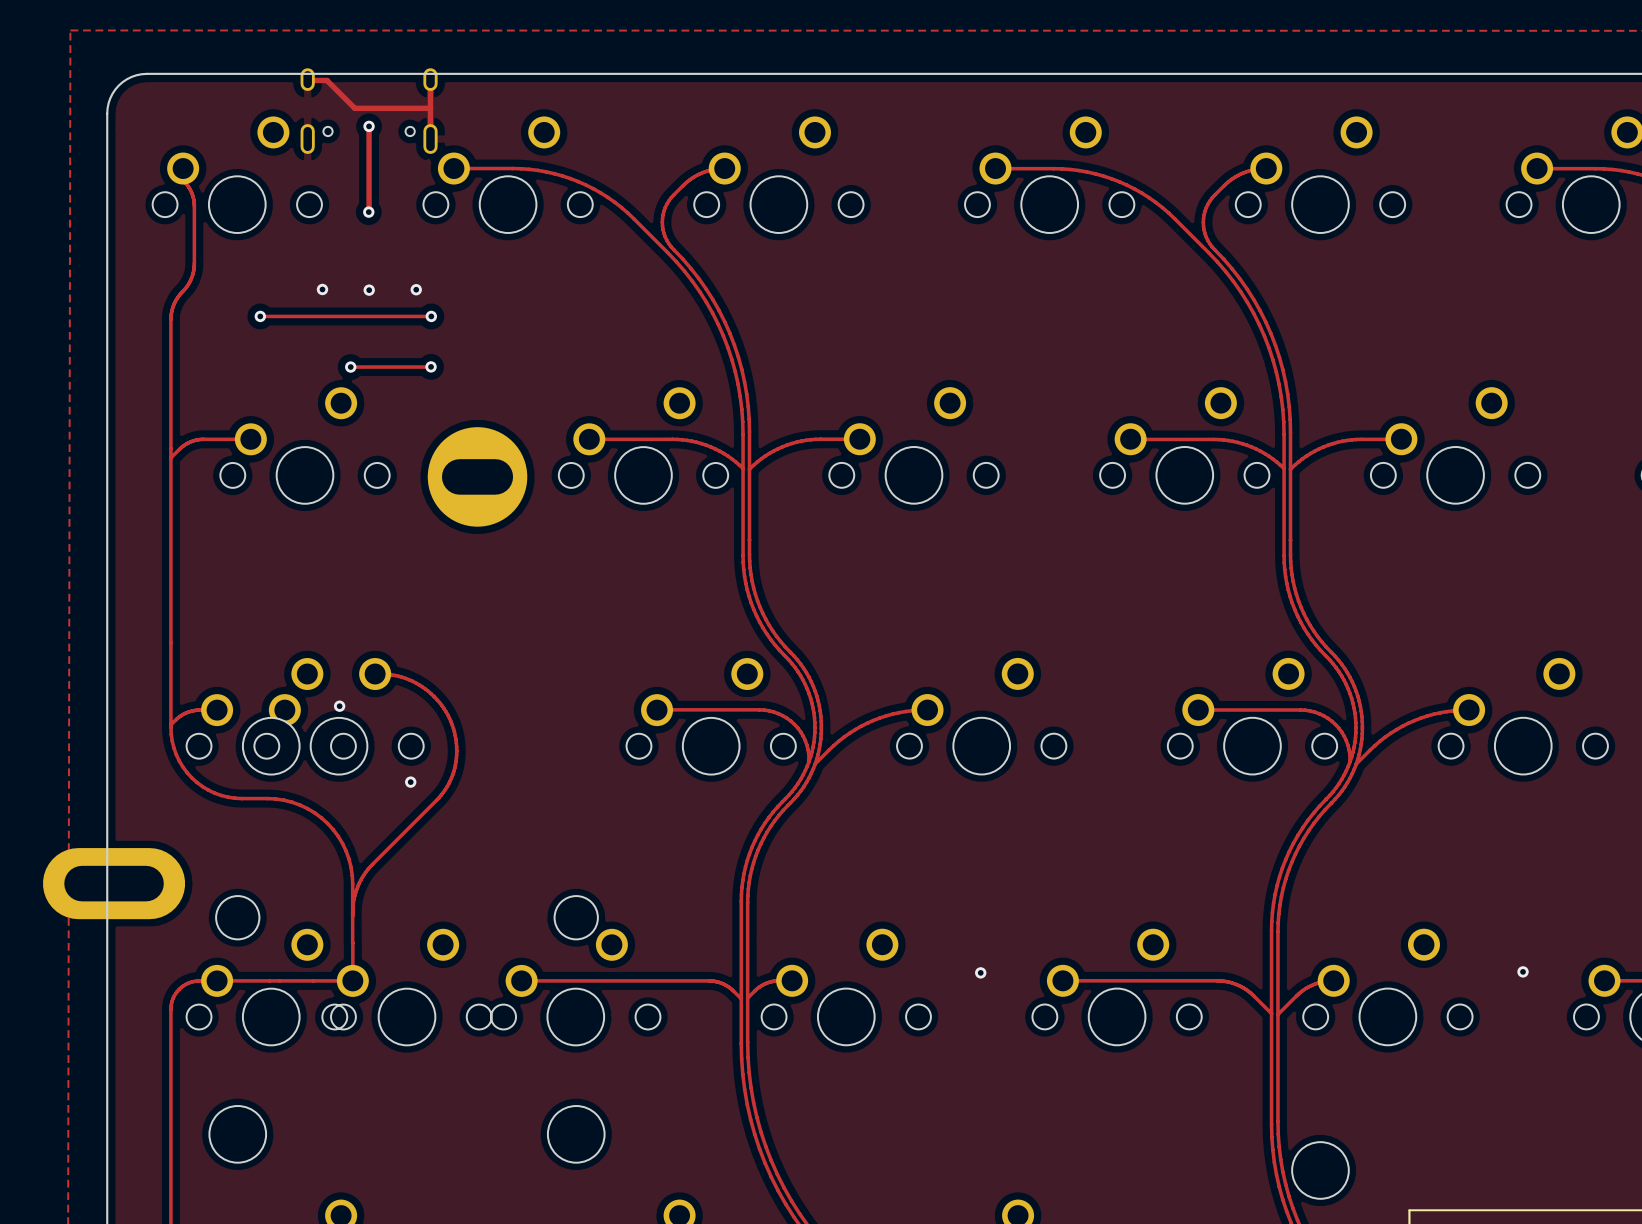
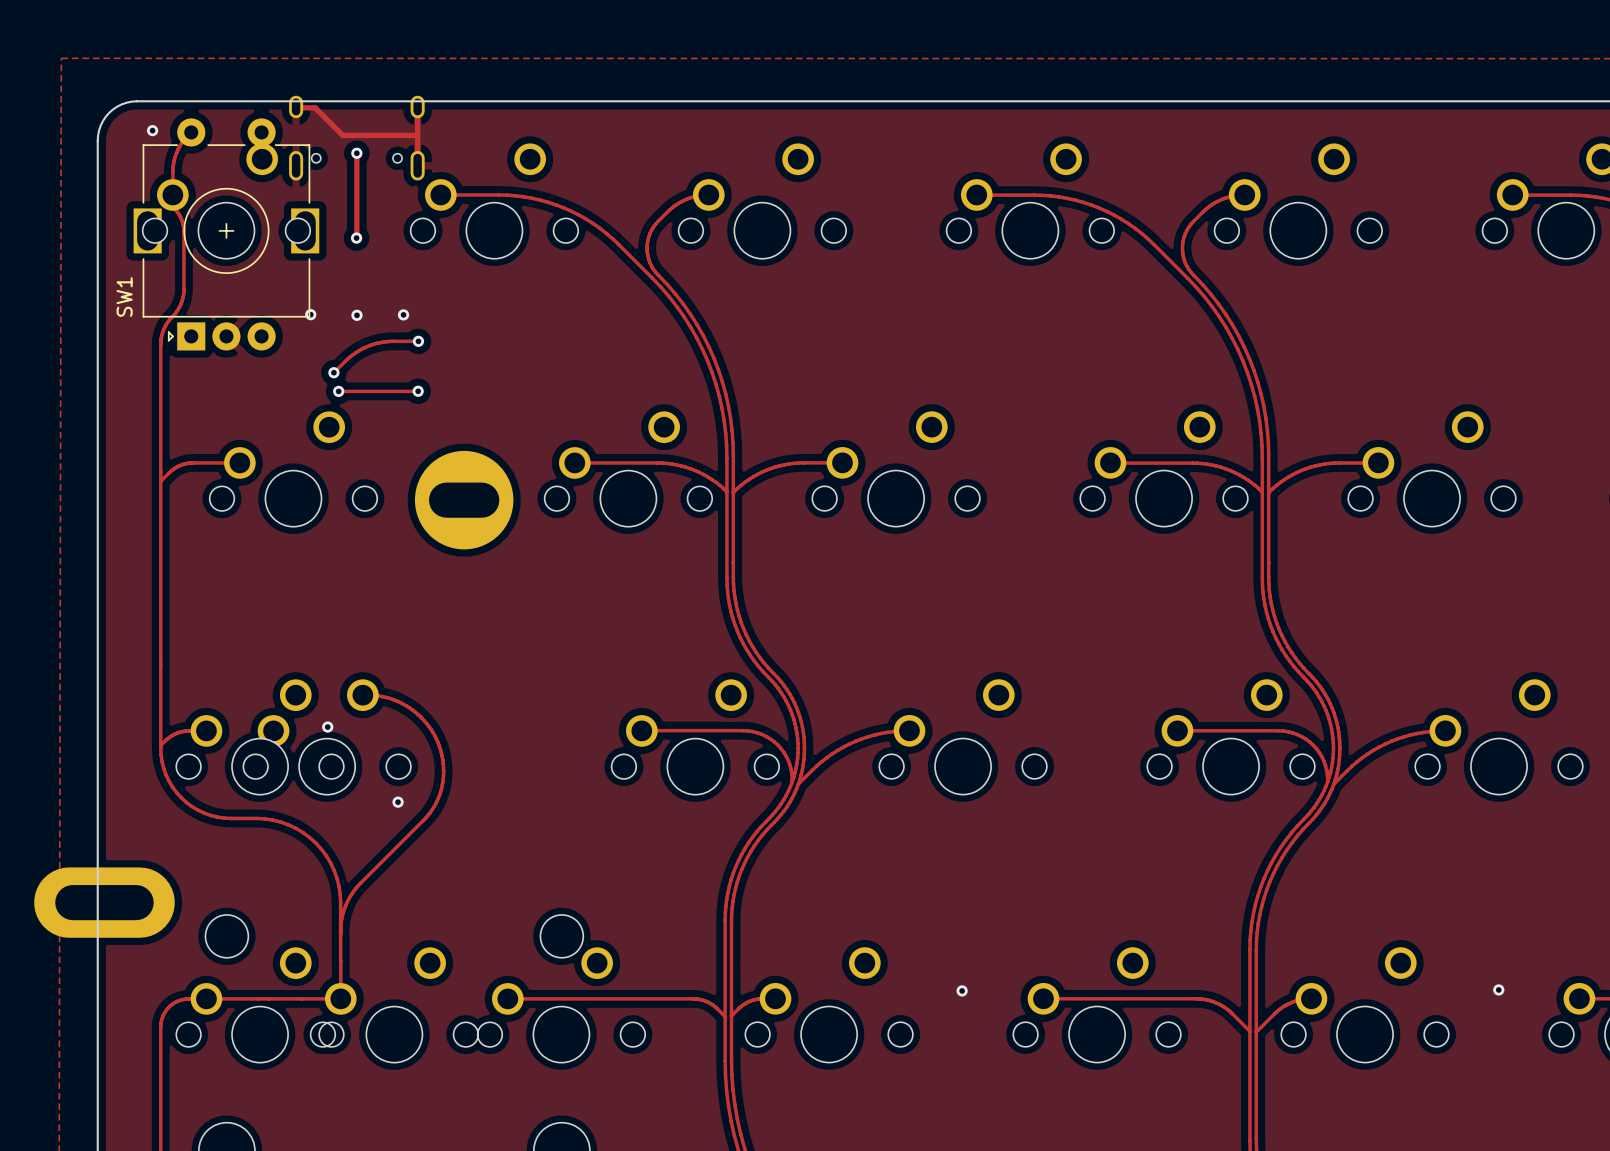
via: none -> (152, 130)
track: none -> (191, 132) (181, 143) (175, 157) (172, 194)
SW1: none -> (226, 234)
track: (260, 316) (406, 316) -> (333, 372) (350, 356) (361, 349) (376, 343) (393, 341)
via: (260, 316) -> none
via: none -> (333, 372)

